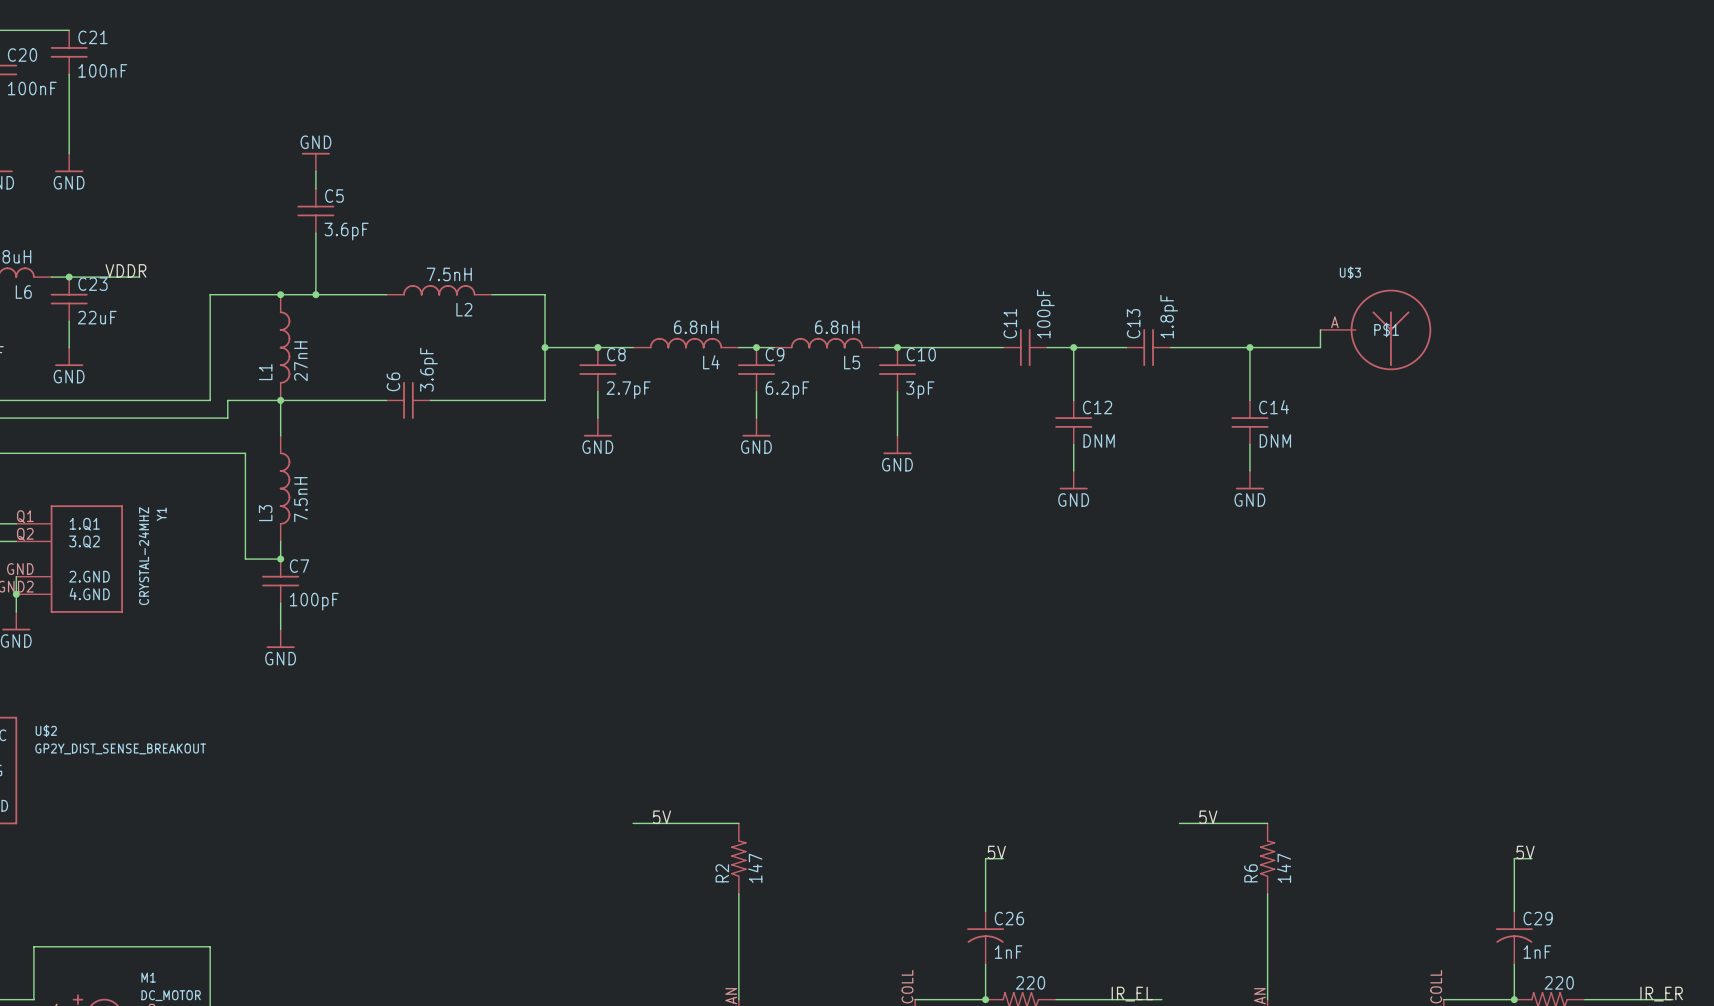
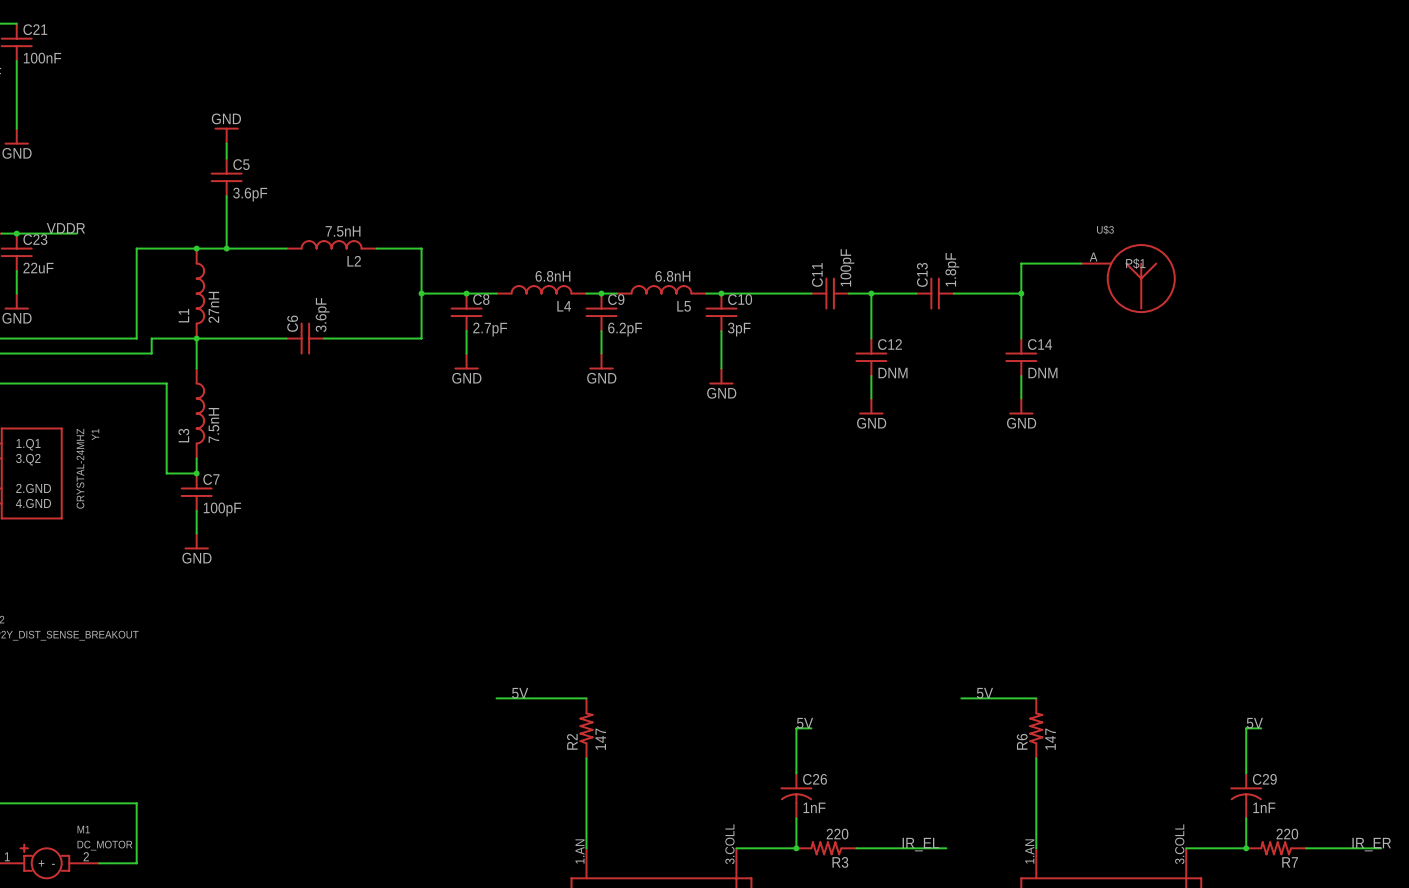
U$3 symbol: [1320, 289, 1432, 371] -> [1081, 244, 1176, 313]
wire: (1320, 329) (1320, 347) (1249, 347) -> (1081, 263) (1021, 263) (1021, 293)

